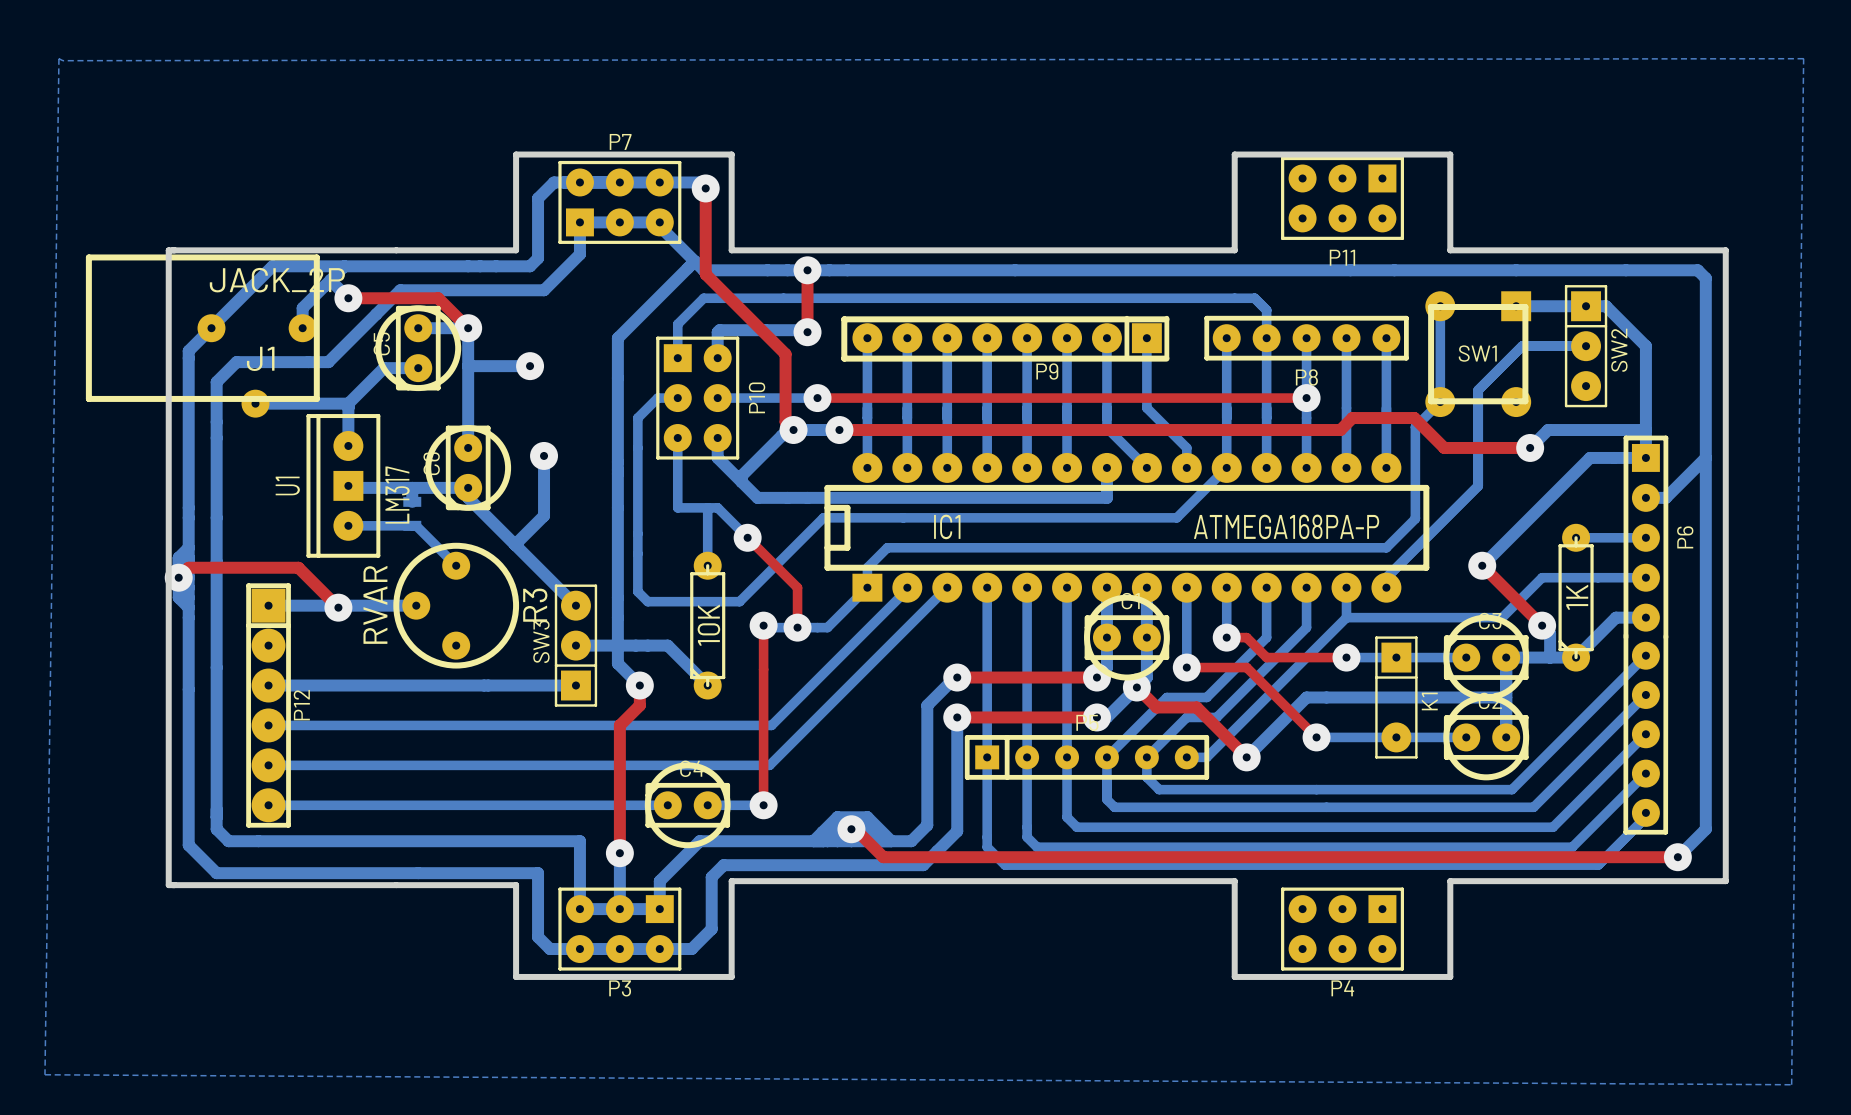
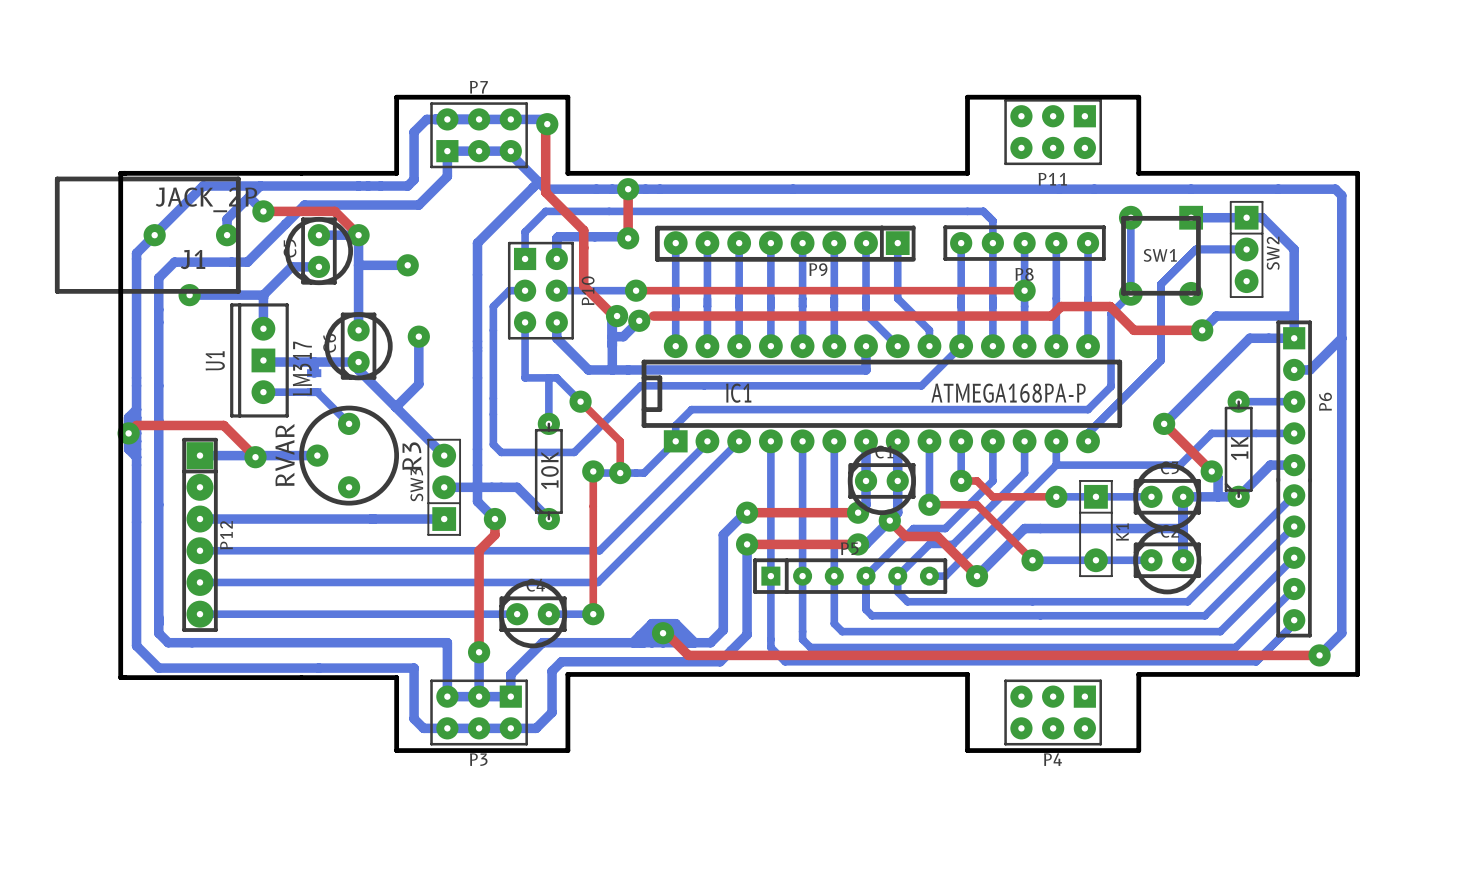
bottom zone outline: (58, 58) (62, 60) (1803, 58) (1791, 1084) (44, 1074) (58, 58) -> none
top track: none -> (545, 119) (545, 192) (583, 230) (583, 285) (612, 314)
top track: (705, 188) (705, 274) (785, 354) (785, 422) (793, 430) -> none
bottom track: none -> (612, 314) (612, 369)
bottom track: (839, 430) (787, 430) (741, 475) (741, 481) -> none
via position: (839, 430) -> (639, 320)
bottom track: none -> (639, 320) (623, 336) (612, 336)

